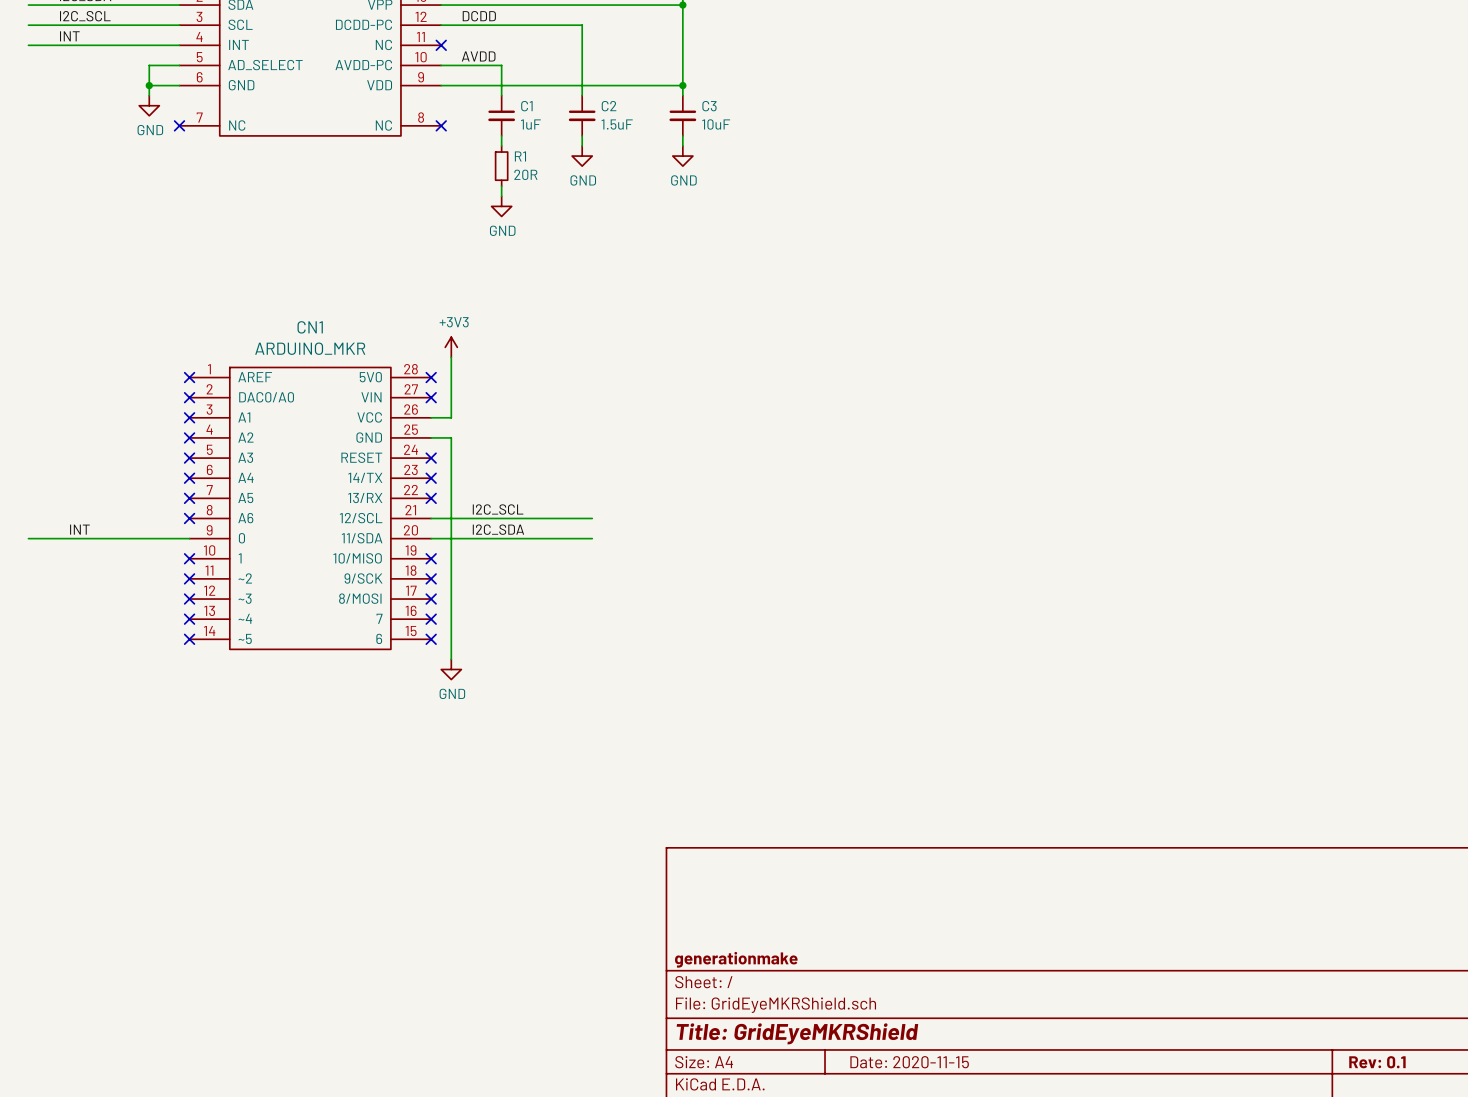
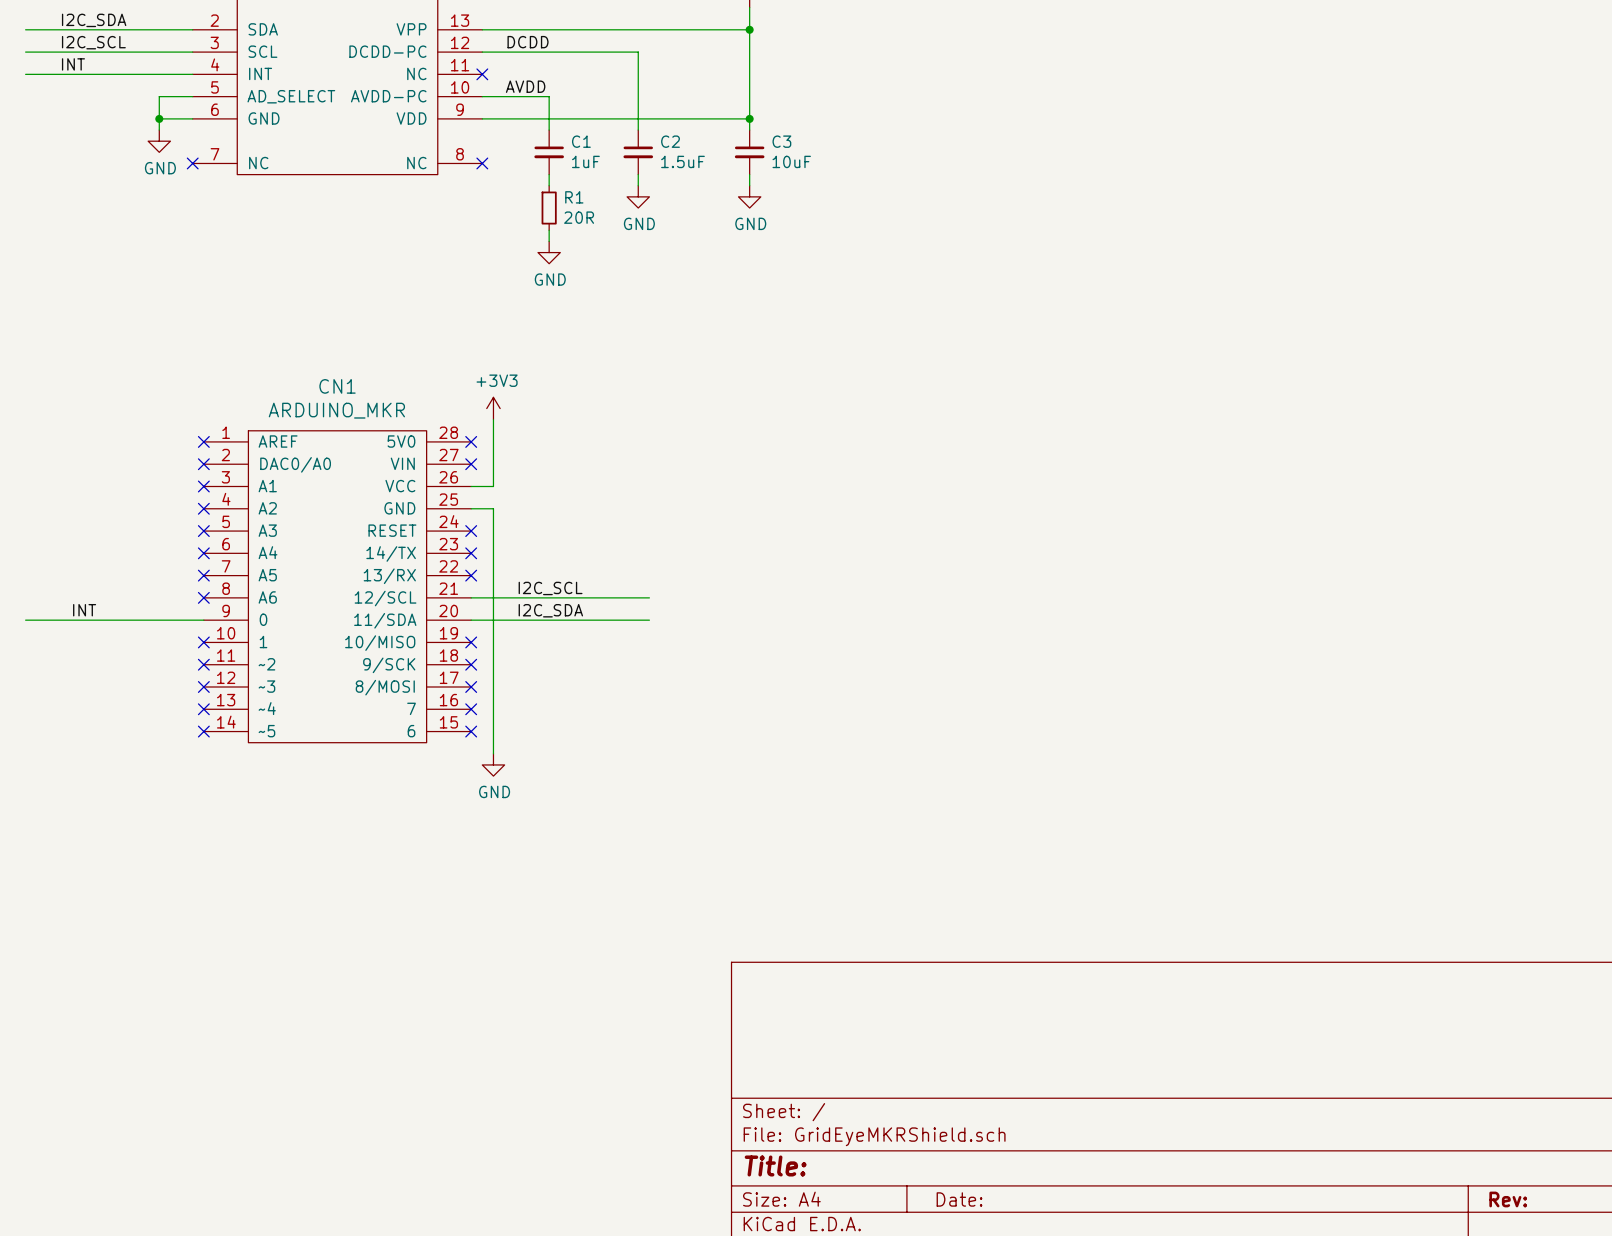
title block: generationmake (736, 959) -> none
title block: Title: GridEyeMKRShield (797, 1033) -> Title: (775, 1165)
title block: Date: 2020-11-15 (909, 1062) -> Date: (959, 1199)
title block: Rev: 0.1 (1377, 1062) -> Rev: (1508, 1199)

